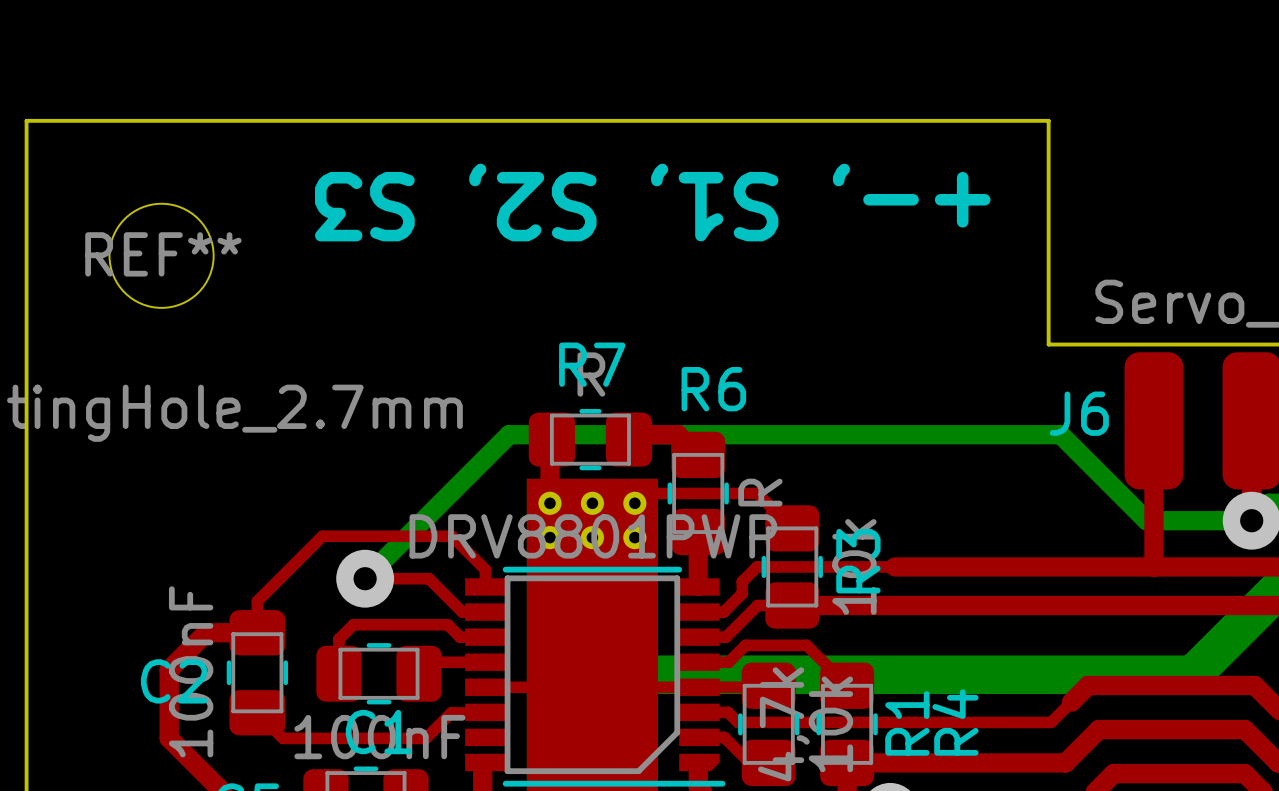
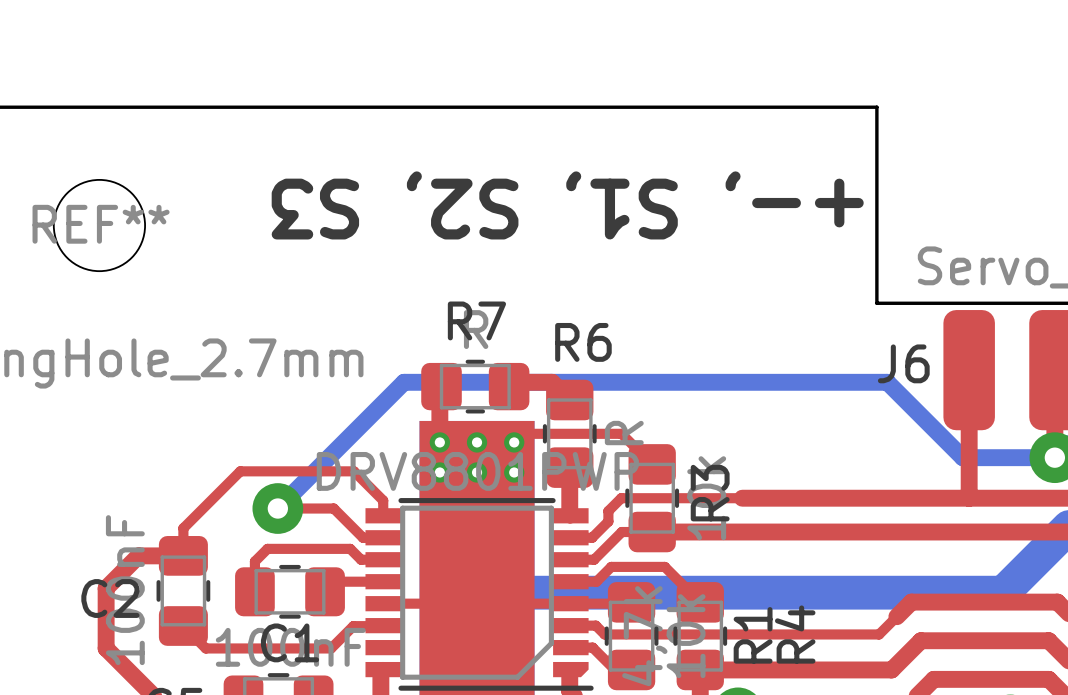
text position: +-, S1, S2, S3 (652, 202) -> +-, S1, S2, S3 (567, 205)

